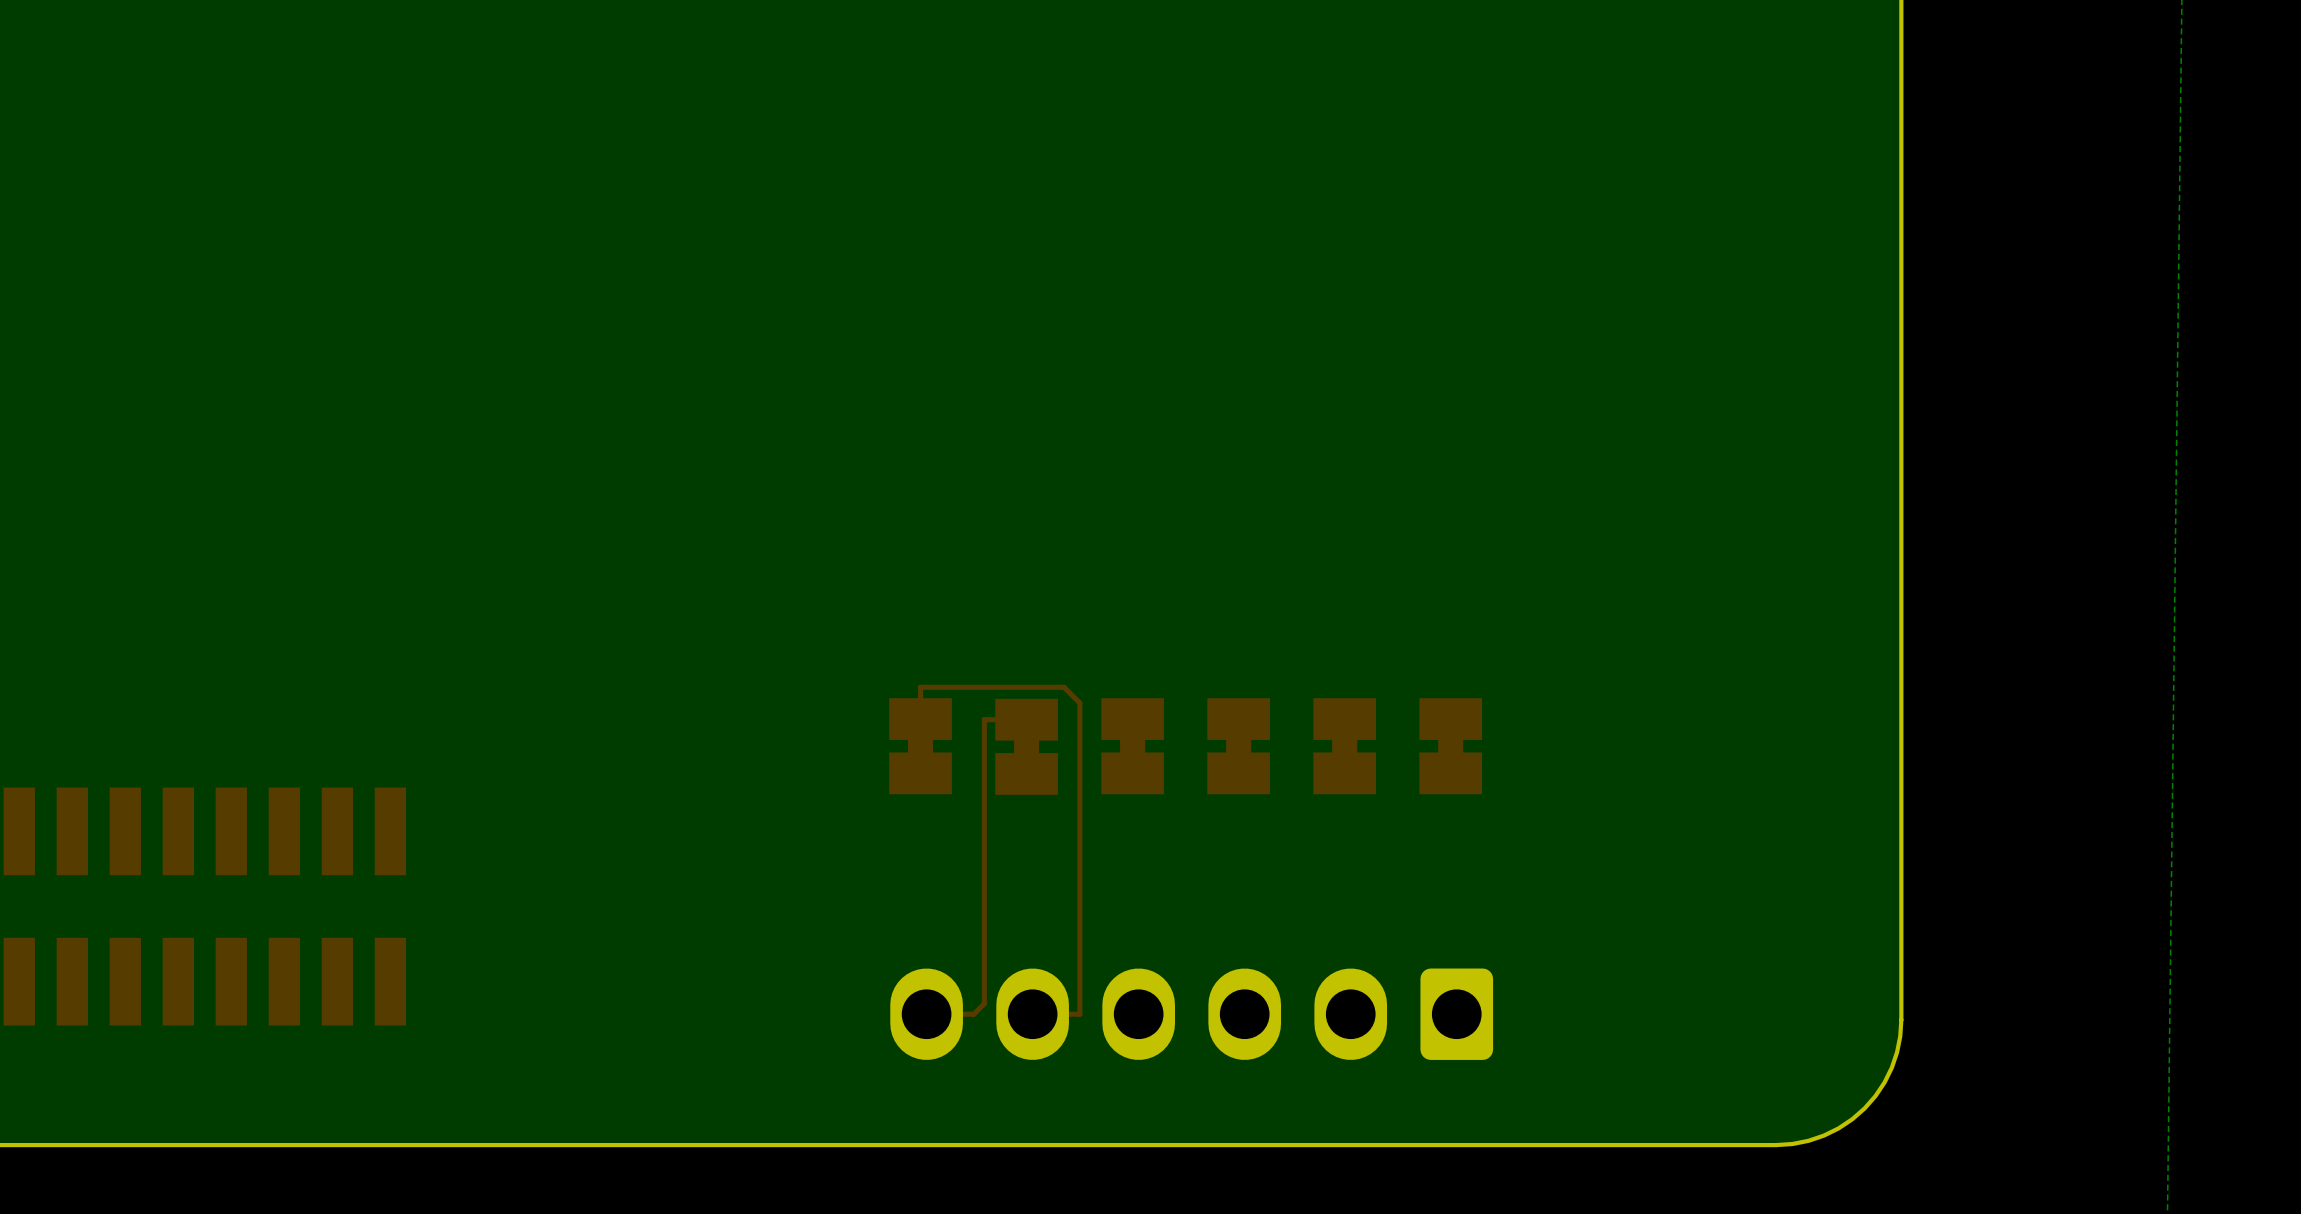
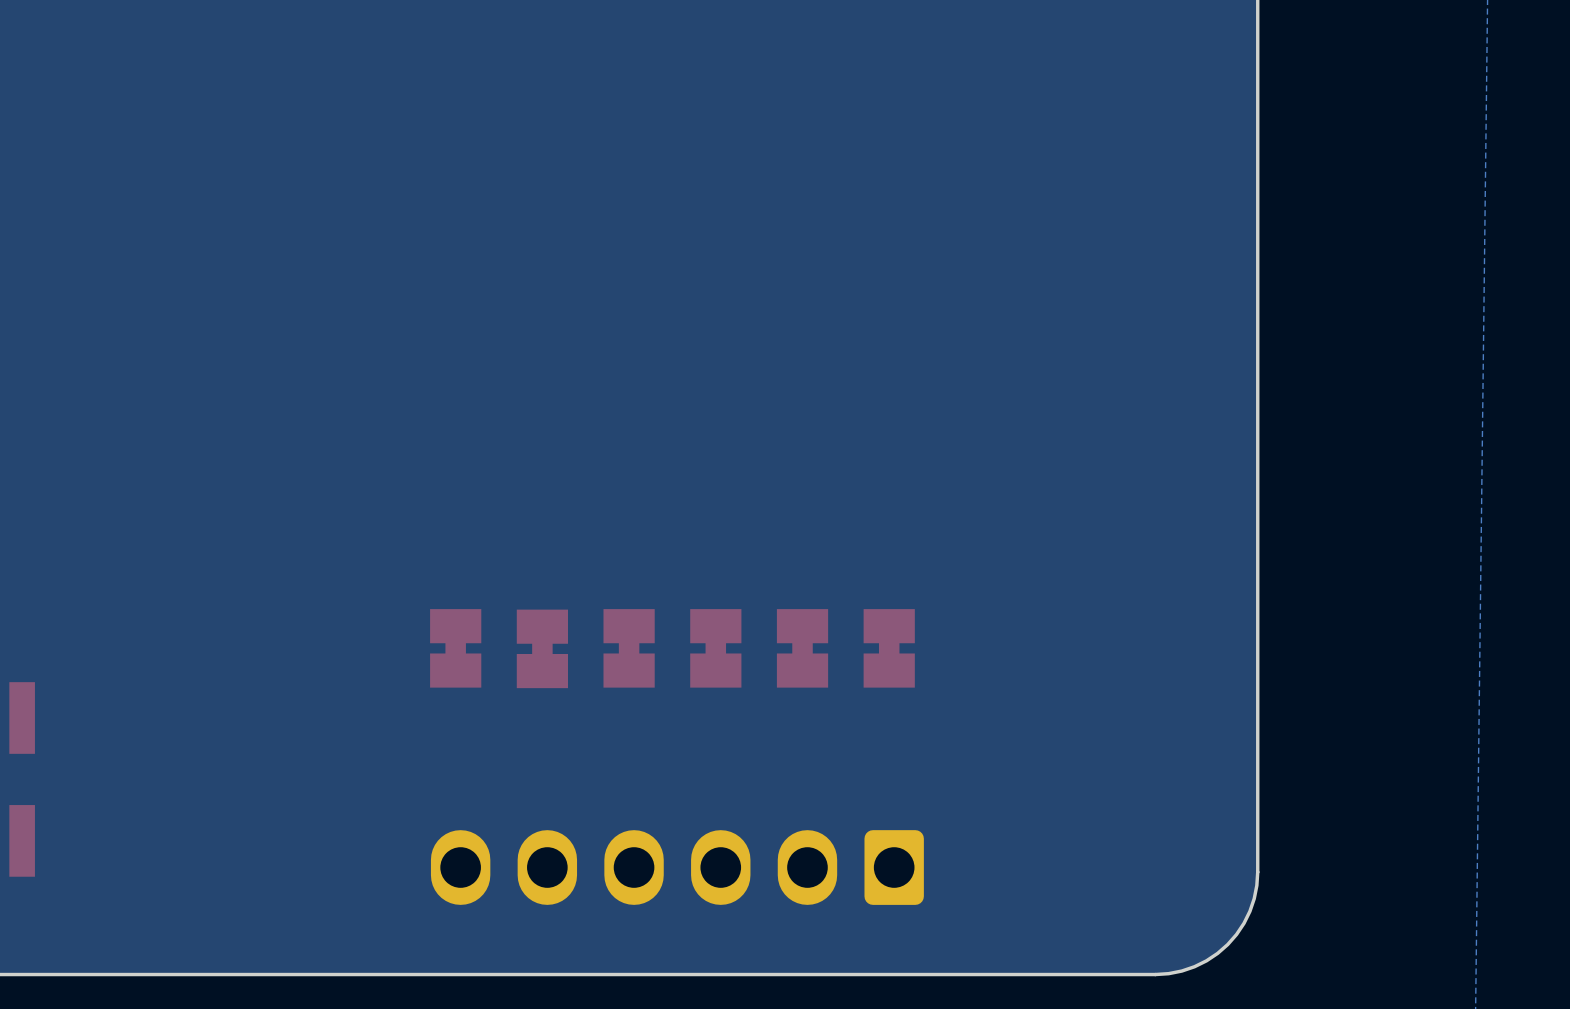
top track: (920, 719) (920, 687) (1064, 687) (1079, 703) (1079, 1014) (1032, 1014) -> none
top track: (1026, 719) (984, 719) (984, 1003) (973, 1014) (926, 1014) -> none

